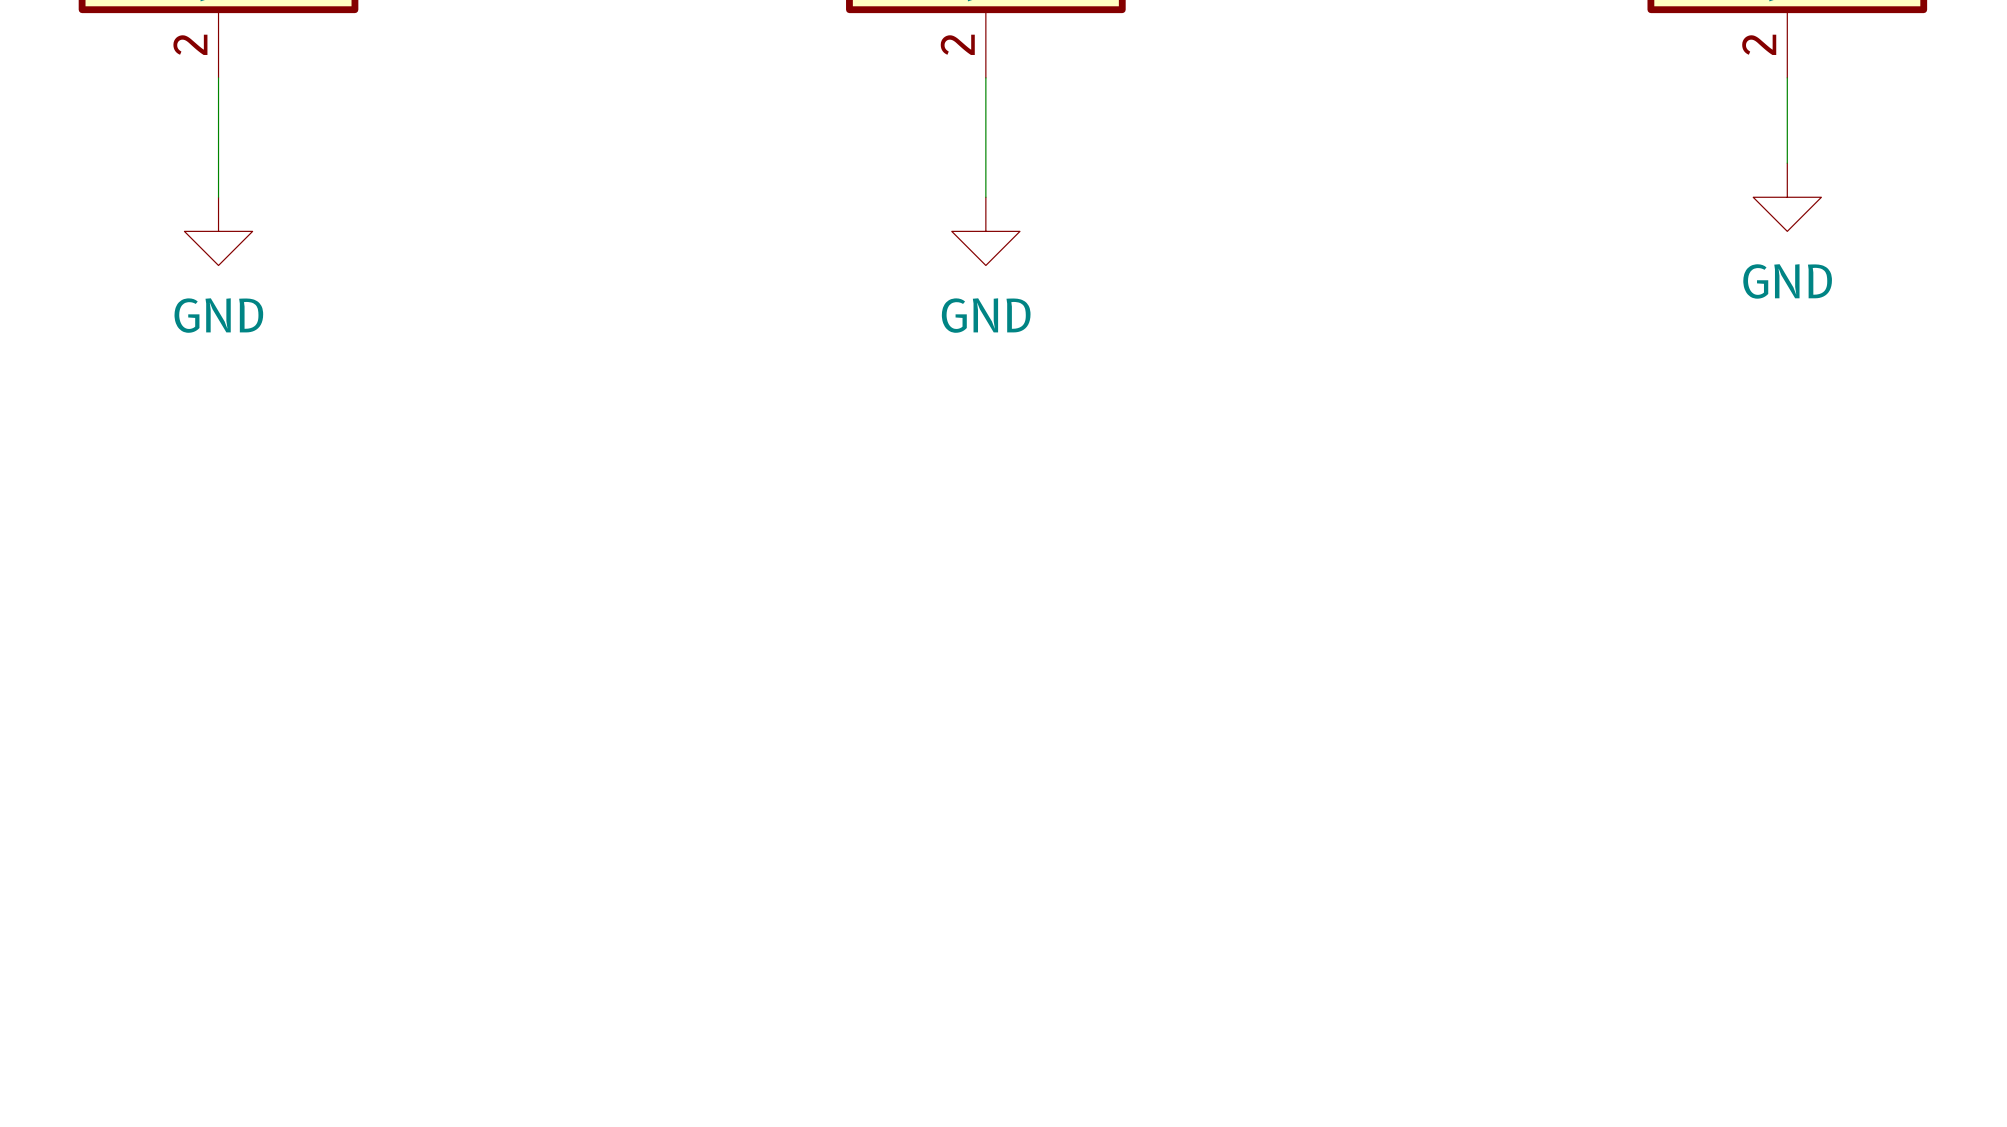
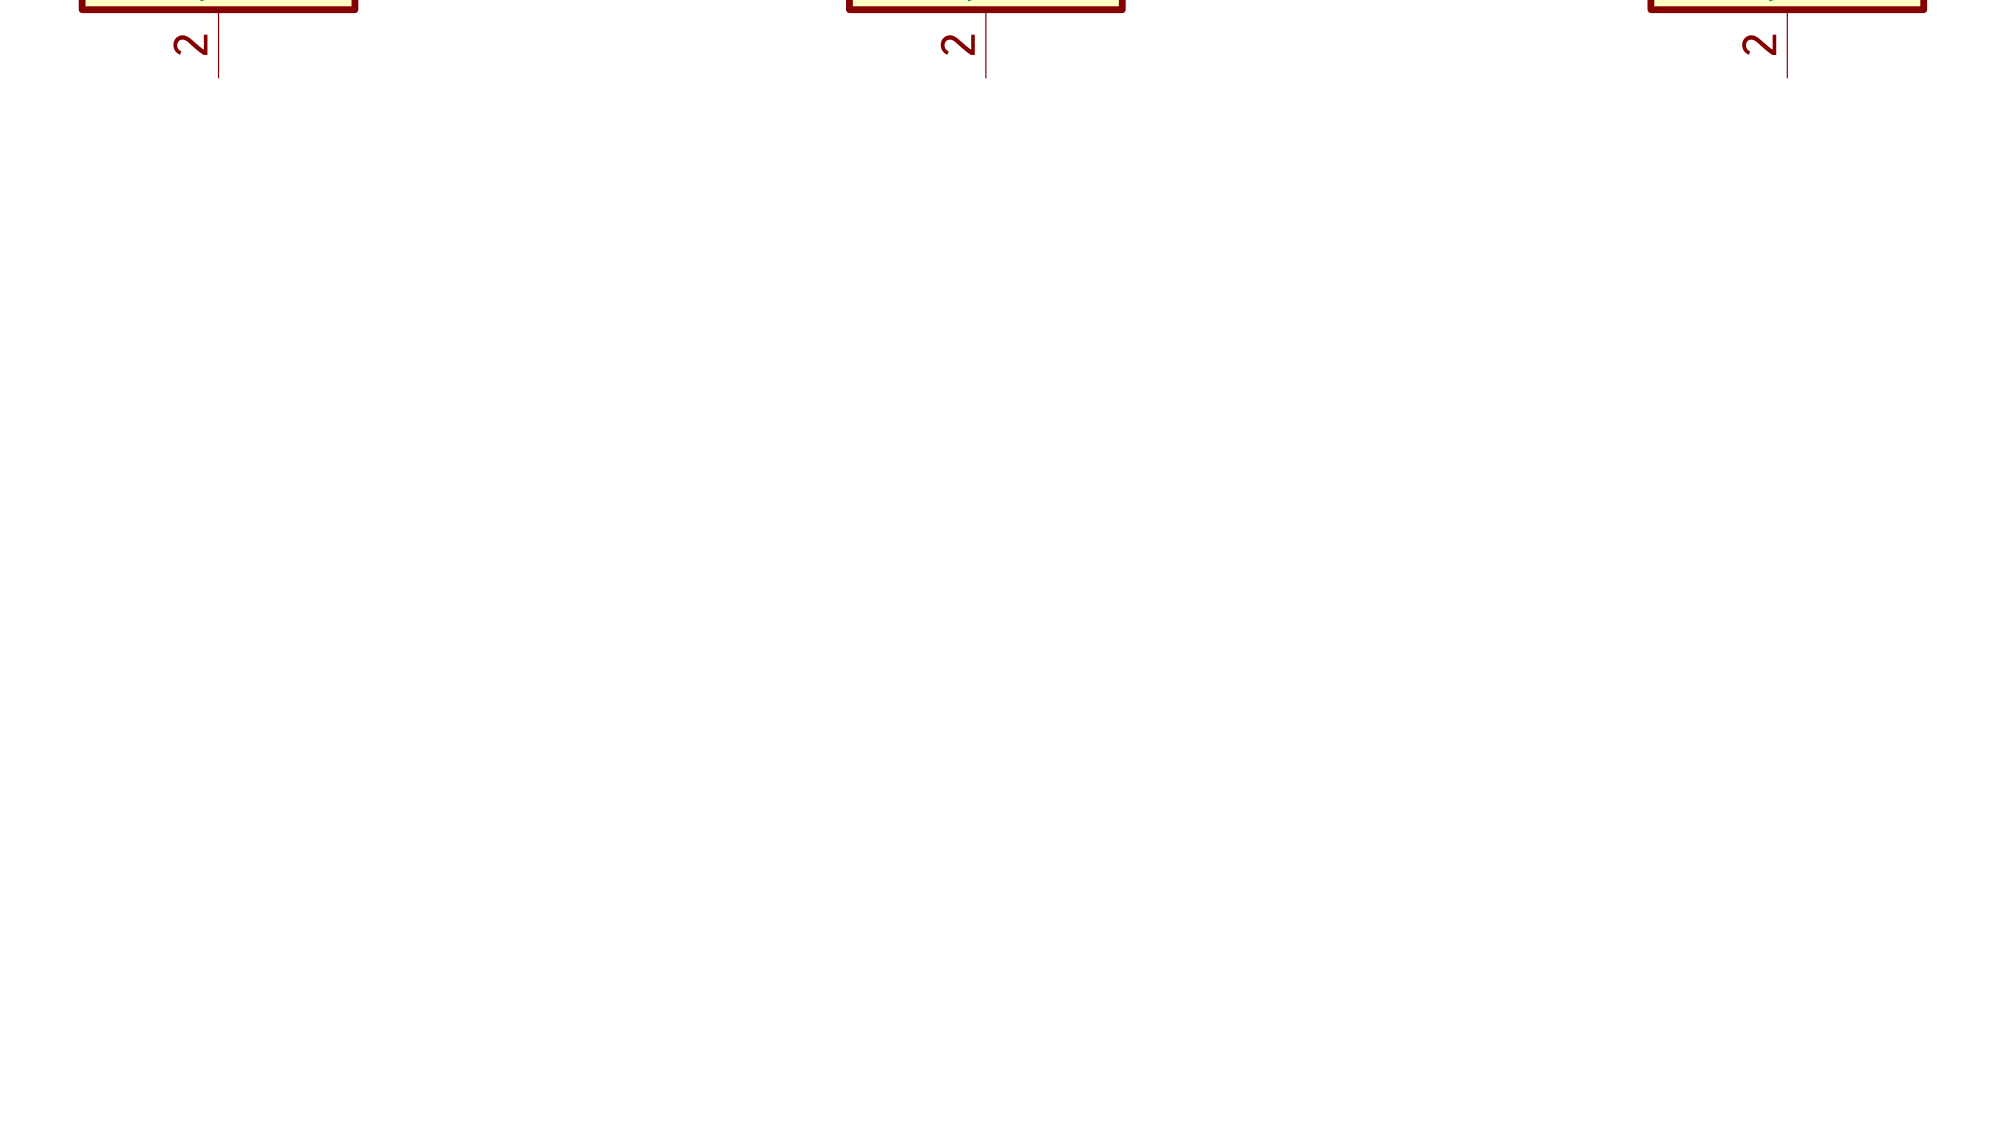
wire: (218, 77) (218, 197) -> none
wire: (985, 77) (985, 197) -> none
wire: (1787, 77) (1787, 163) -> none
power symbol: GND (1787, 197) -> none
power symbol: GND (218, 231) -> none
power symbol: GND (985, 231) -> none

